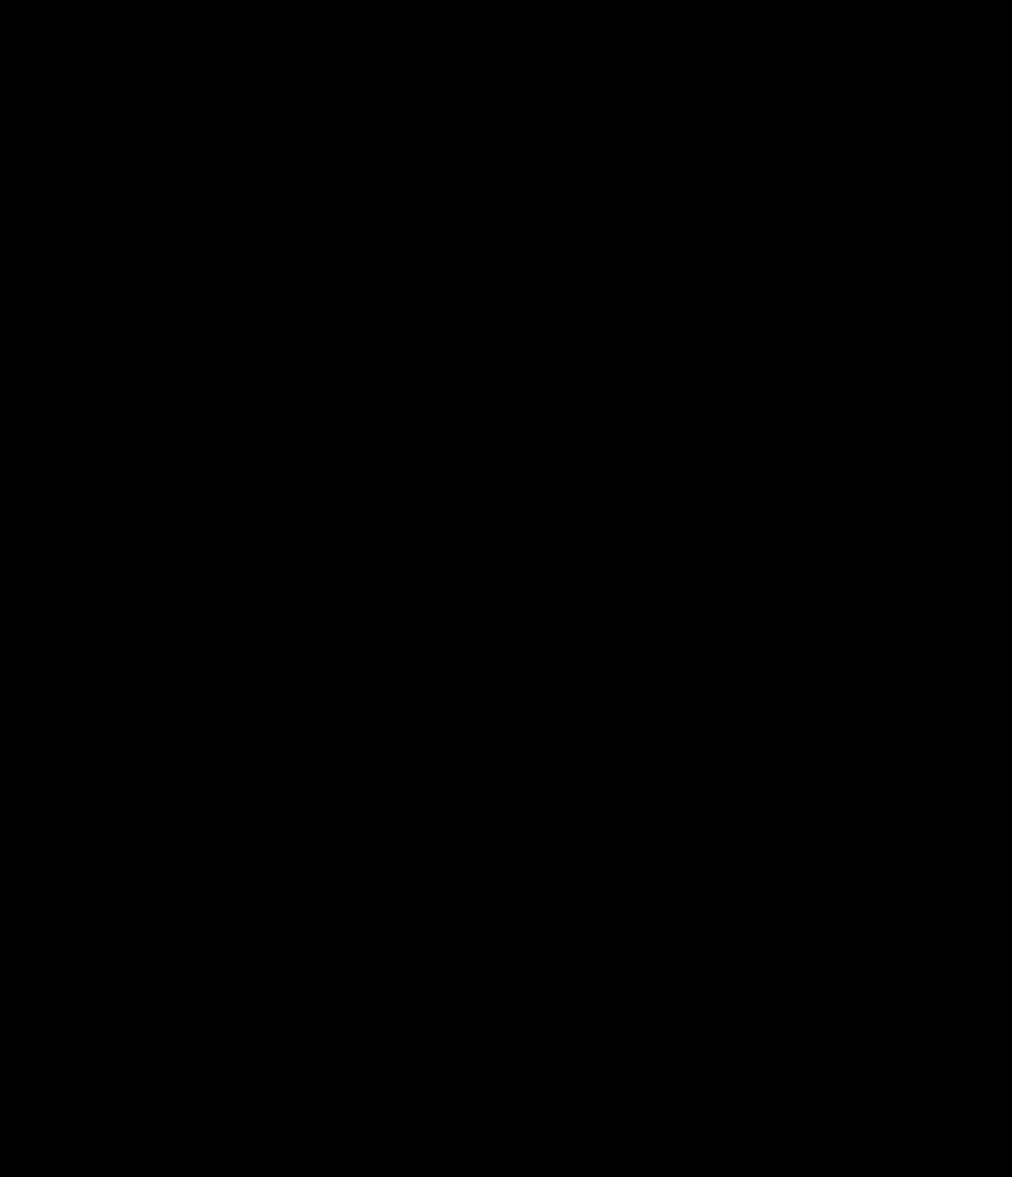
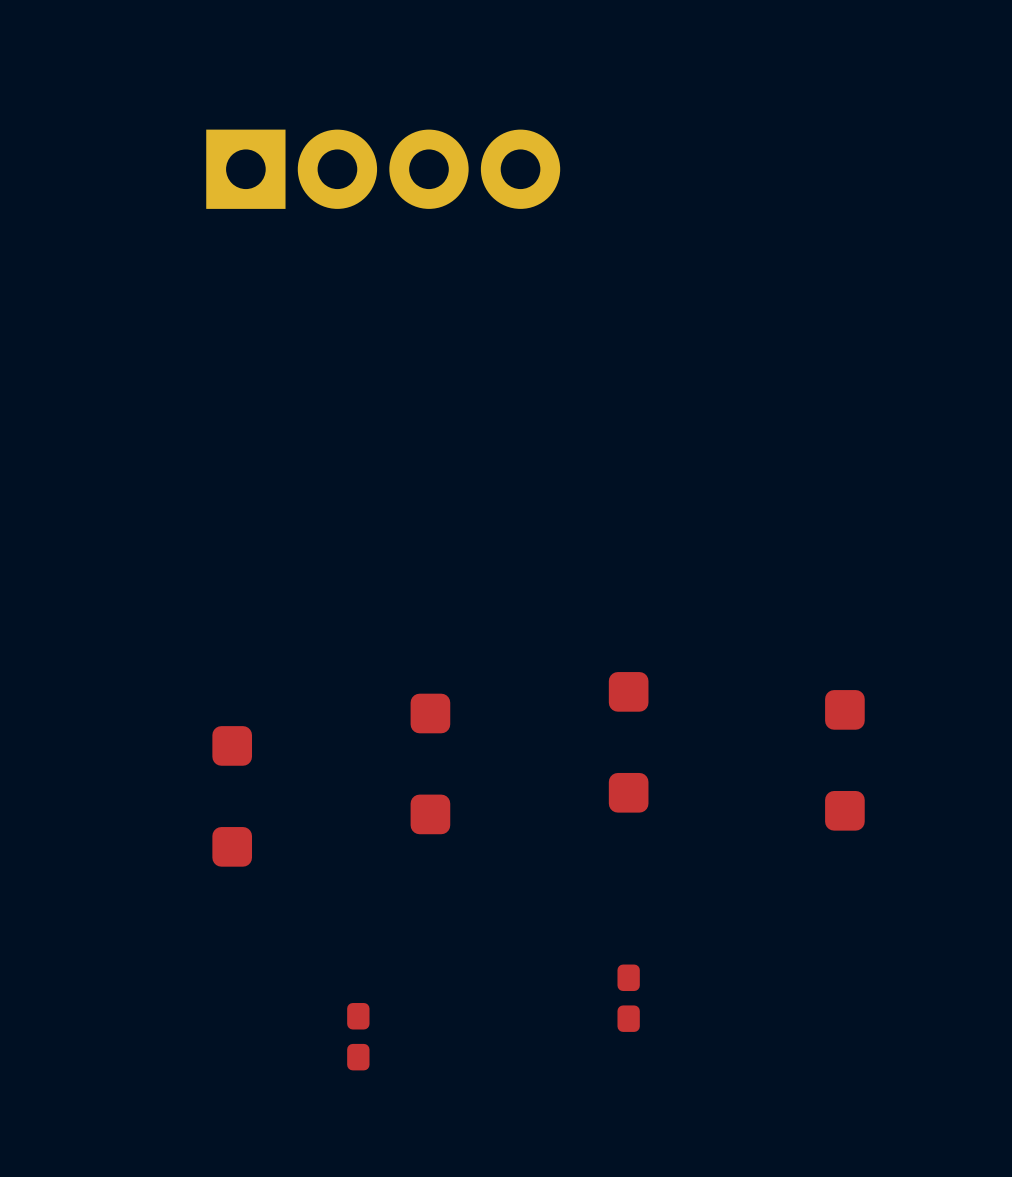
part: none -> (383, 169)
part: none -> (628, 742)
part: none -> (844, 760)
part: none -> (430, 763)
part: none -> (232, 796)
part: none -> (628, 998)
part: none -> (358, 1036)

